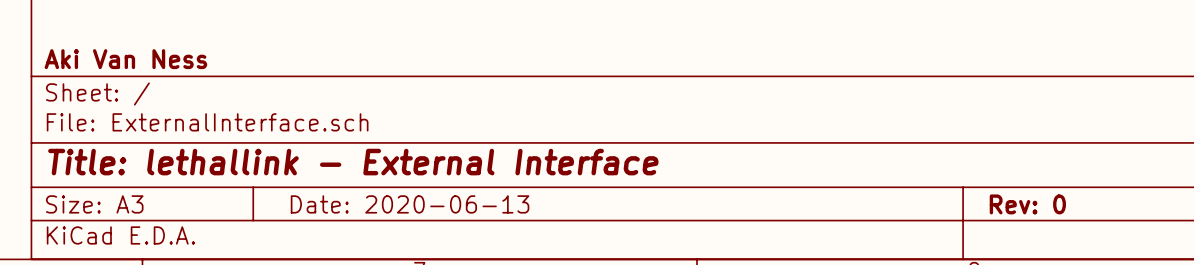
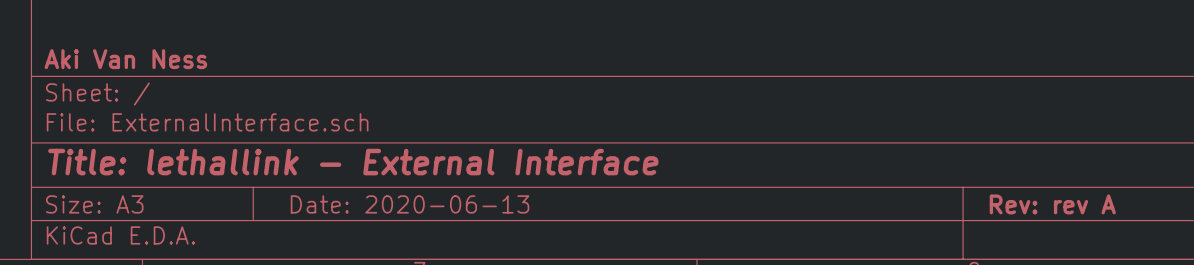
title block: Rev: 0 (1027, 204) -> Rev: rev A (1052, 204)

